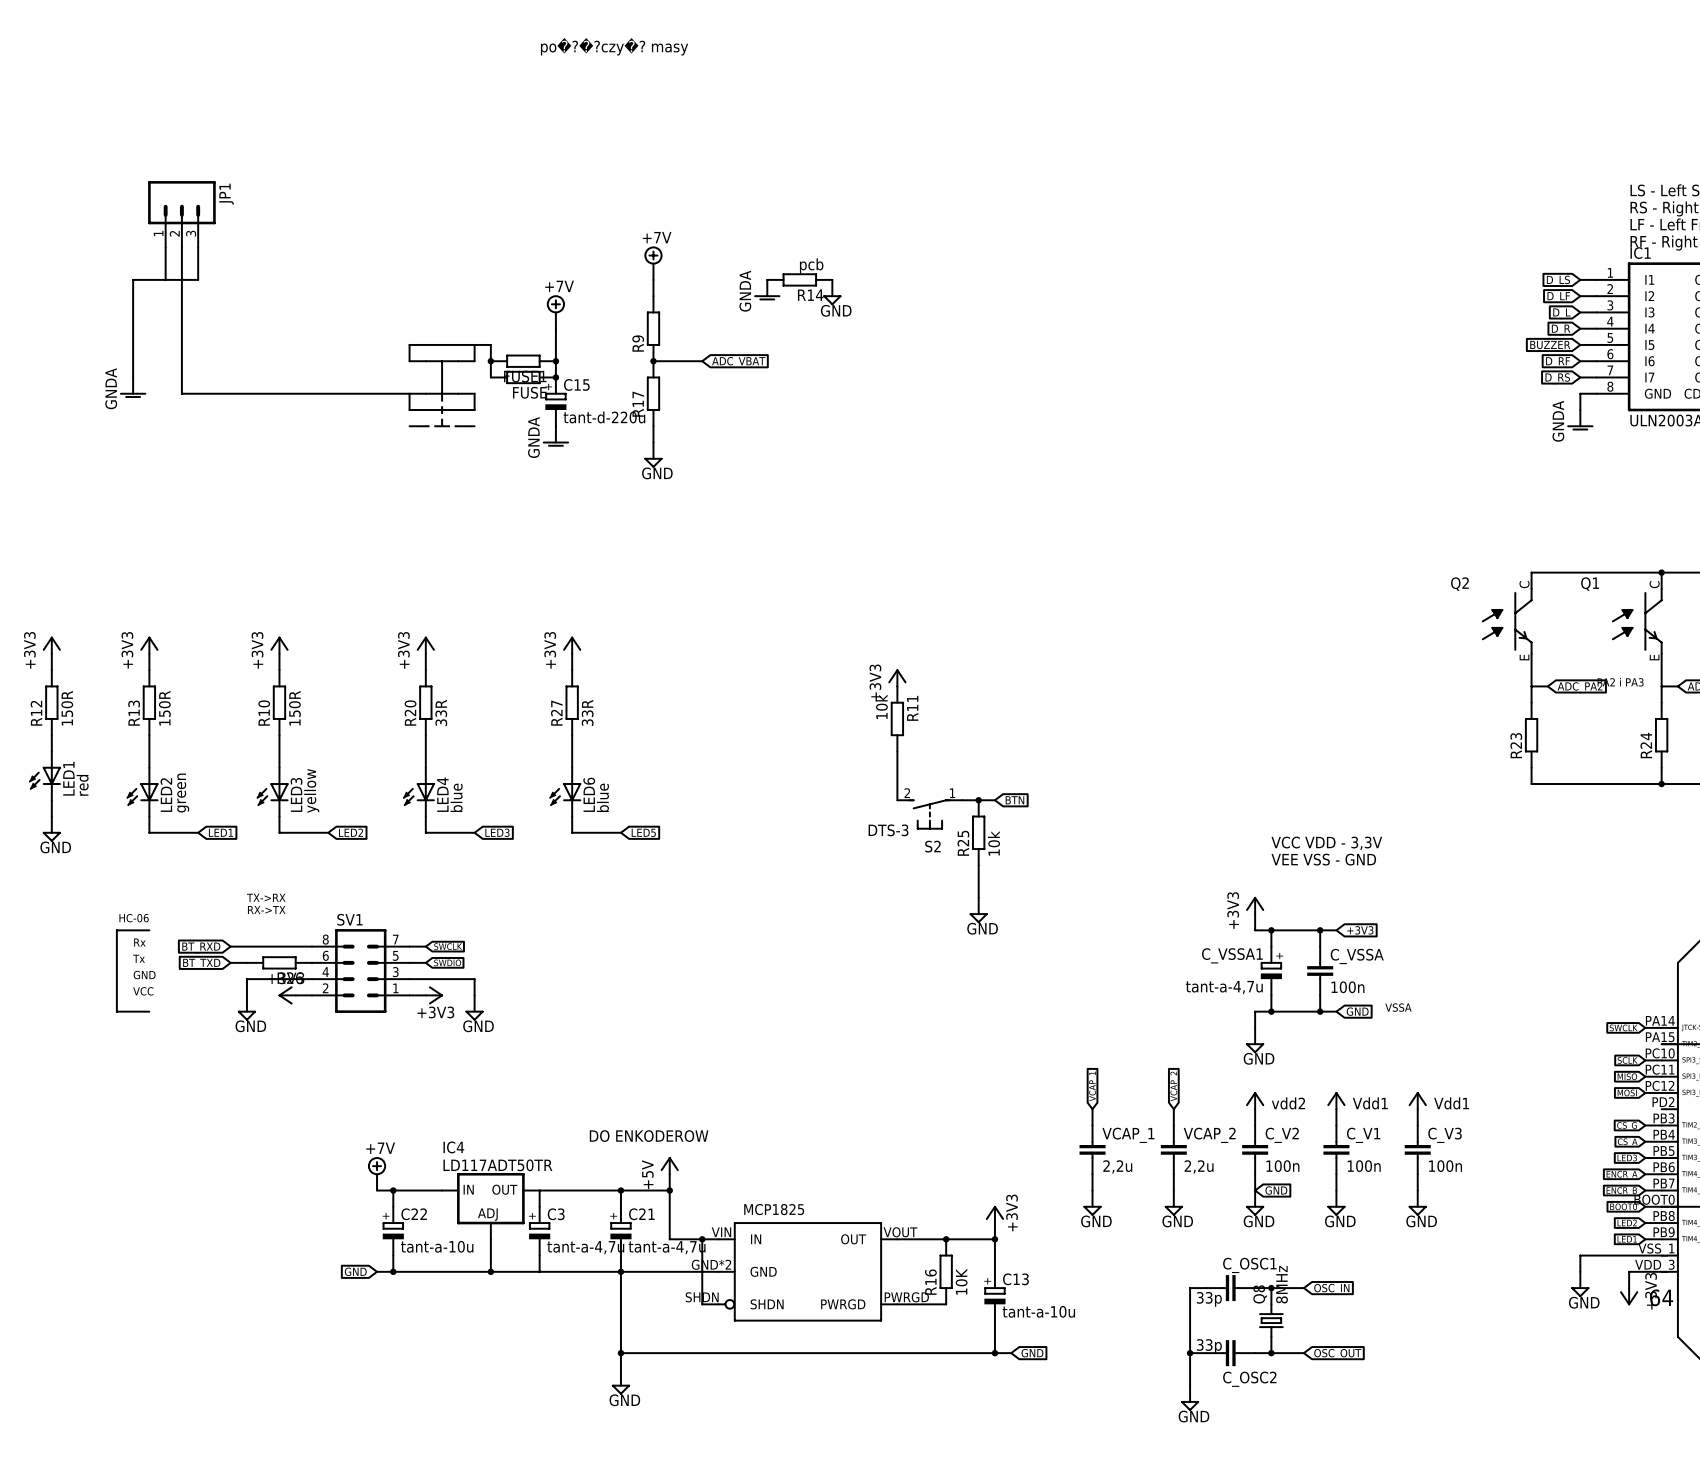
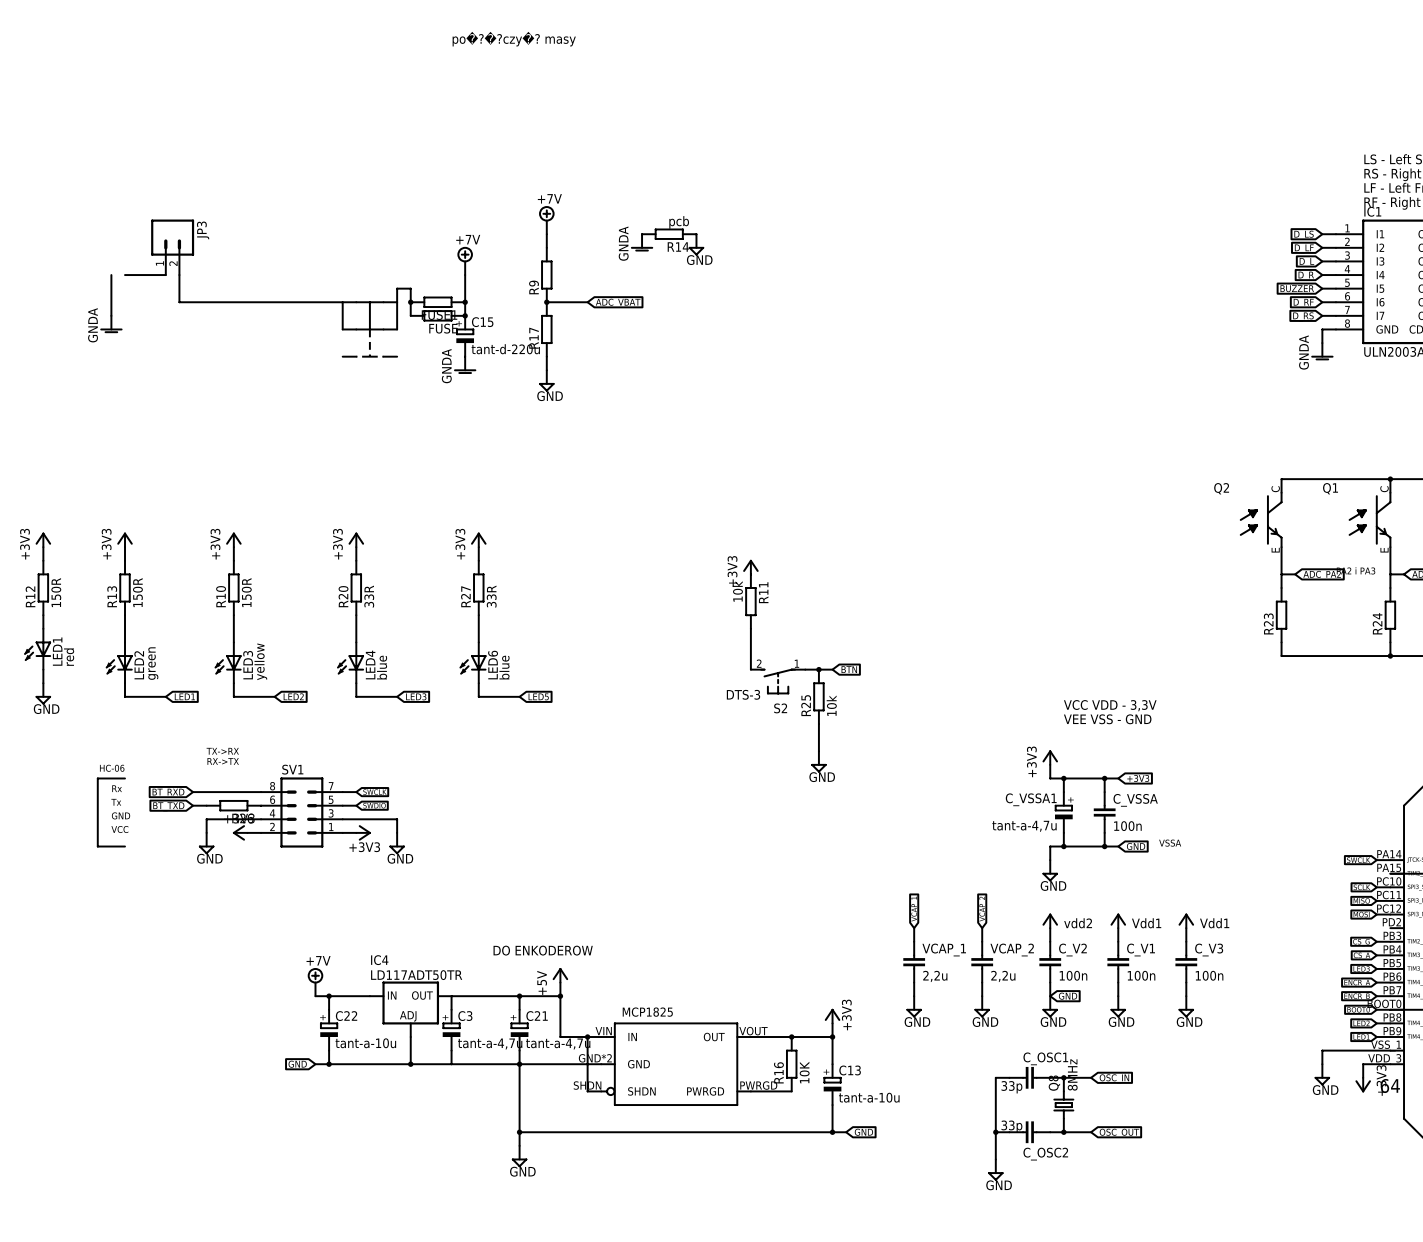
JP1: (181, 214) -> none
wire: (165, 247) (165, 279) -> none
wire: (181, 247) (181, 393) (409, 393) (409, 410) (474, 410) (474, 393) -> (397, 302) (397, 329)
wire: (198, 247) (198, 279) (133, 279) (133, 328) -> none
JP3: none -> (172, 247)
wire: none -> (125, 275) (165, 275)
wire: none -> (179, 275) (179, 302) (342, 302) (342, 329)
wire: (474, 344) (409, 344) (409, 361) -> none

